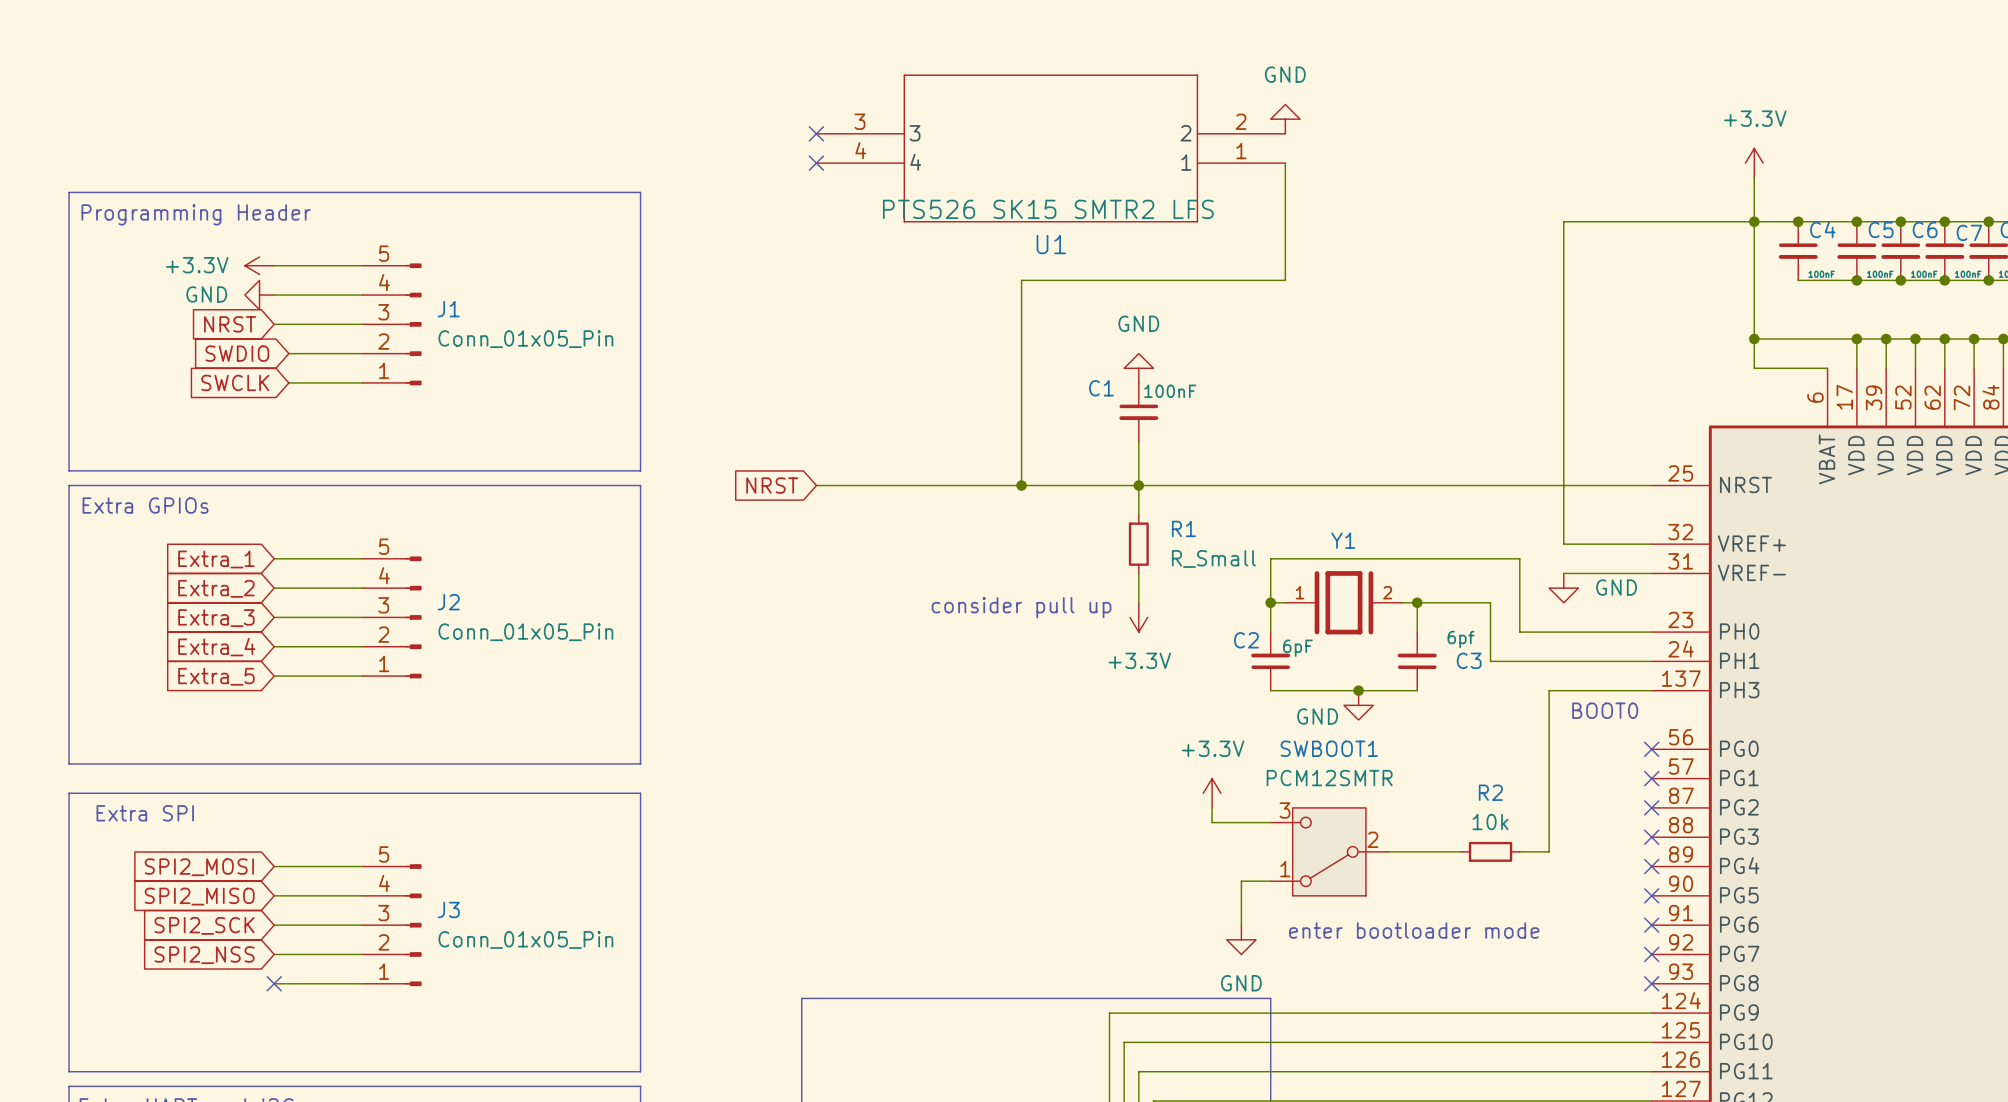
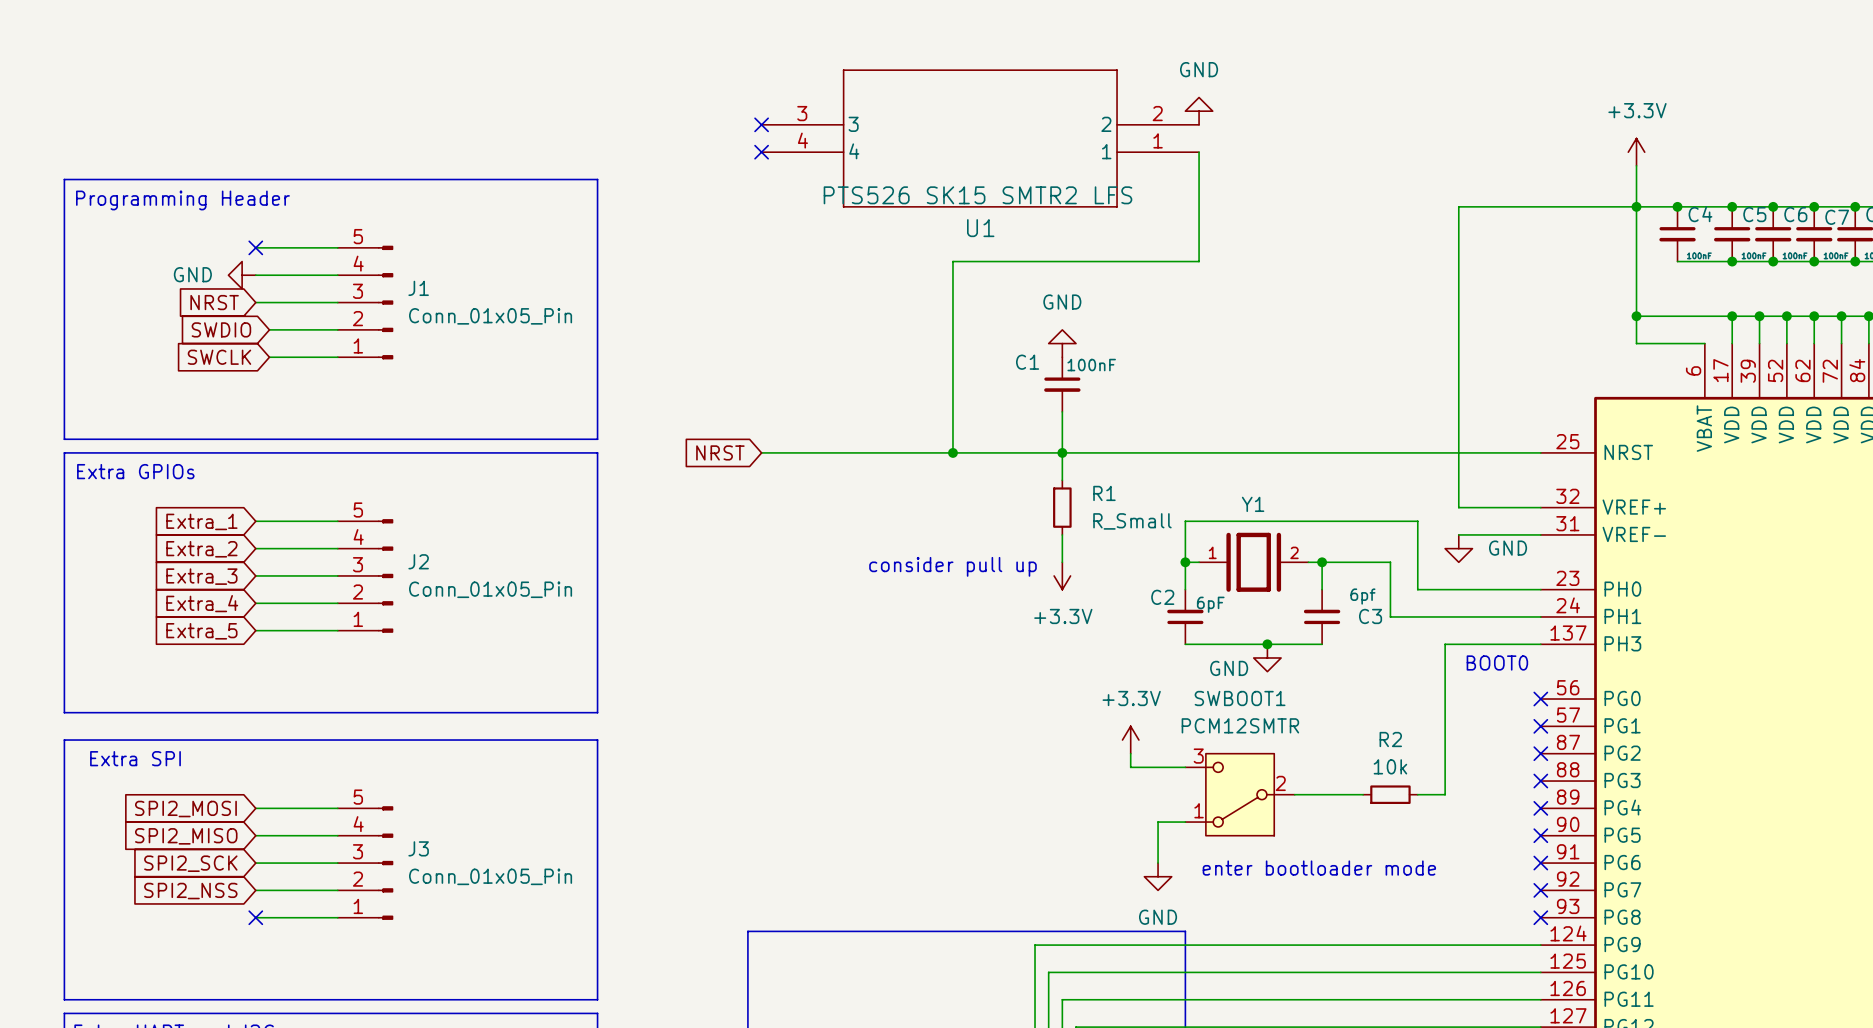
power symbol: +3.3V (259, 265) -> none
no-connect mark: none -> (255, 247)

